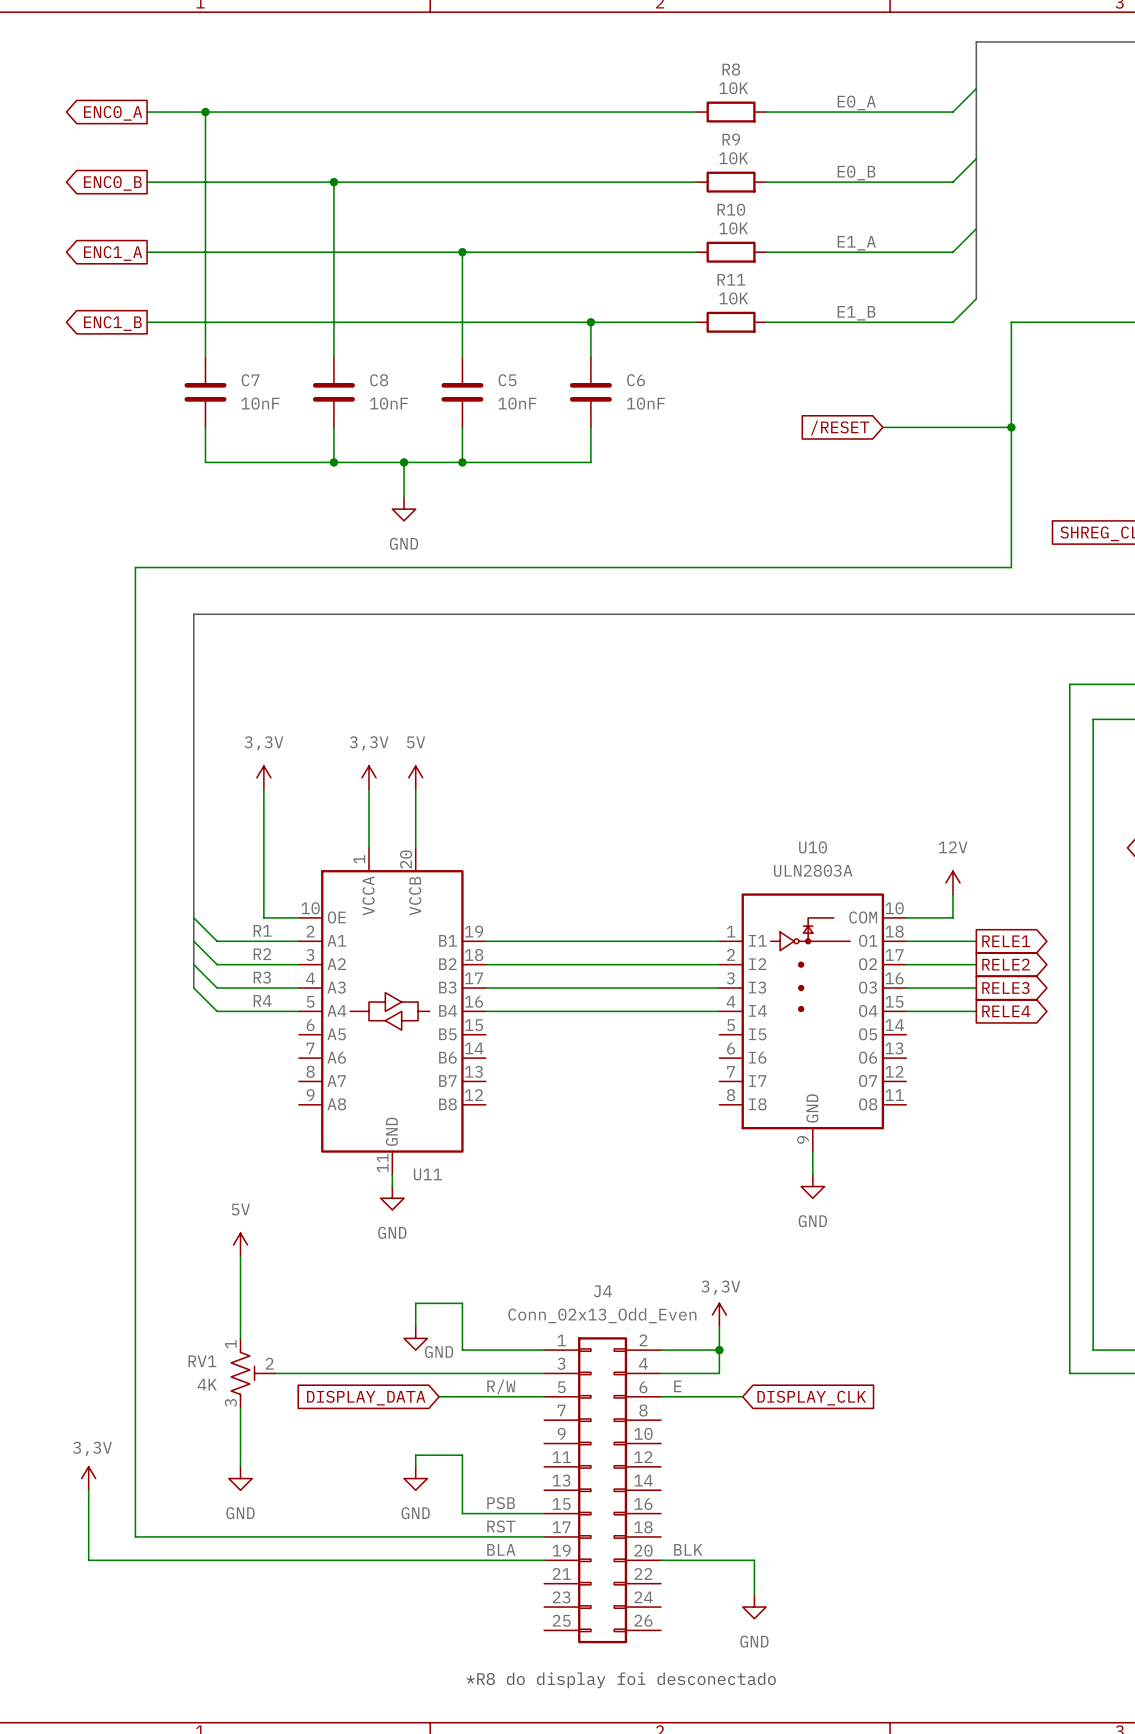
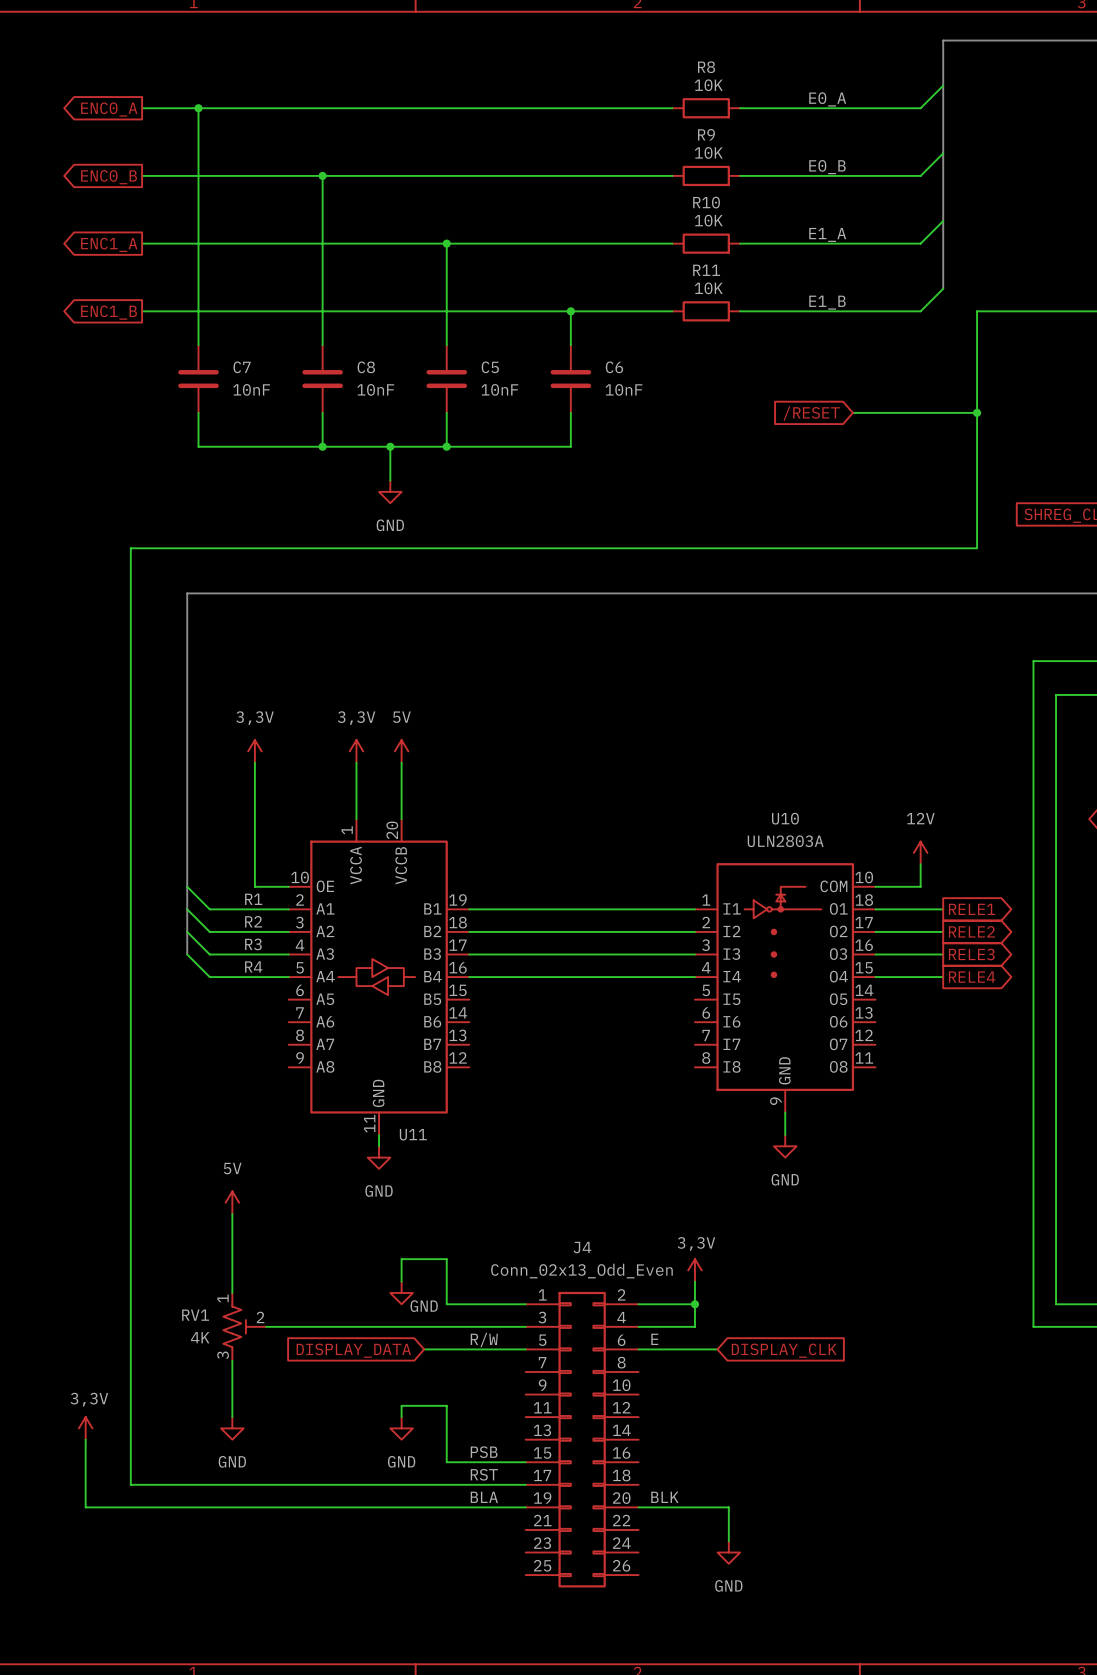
text: *R8 do display foi desconectado (621, 1680) -> none

